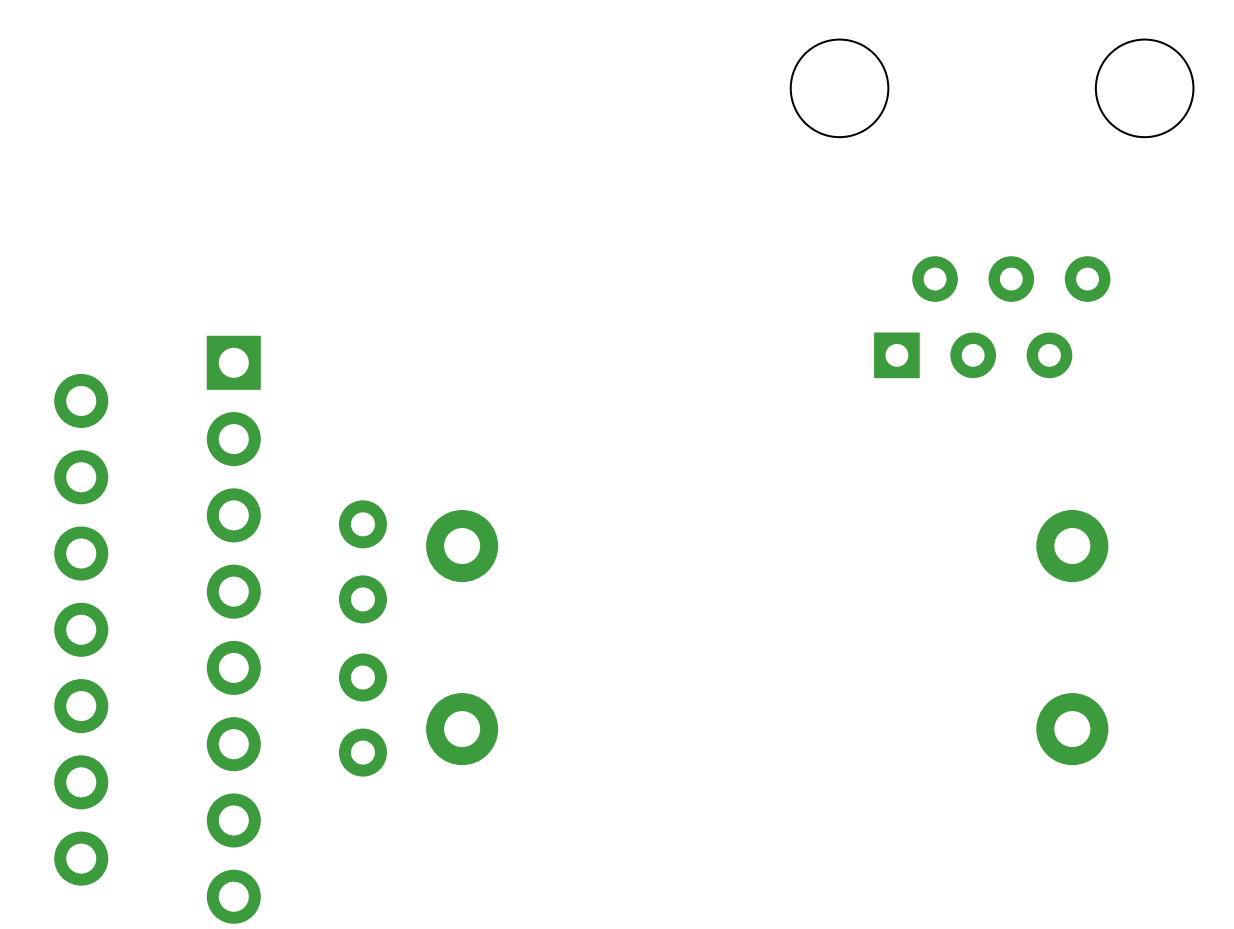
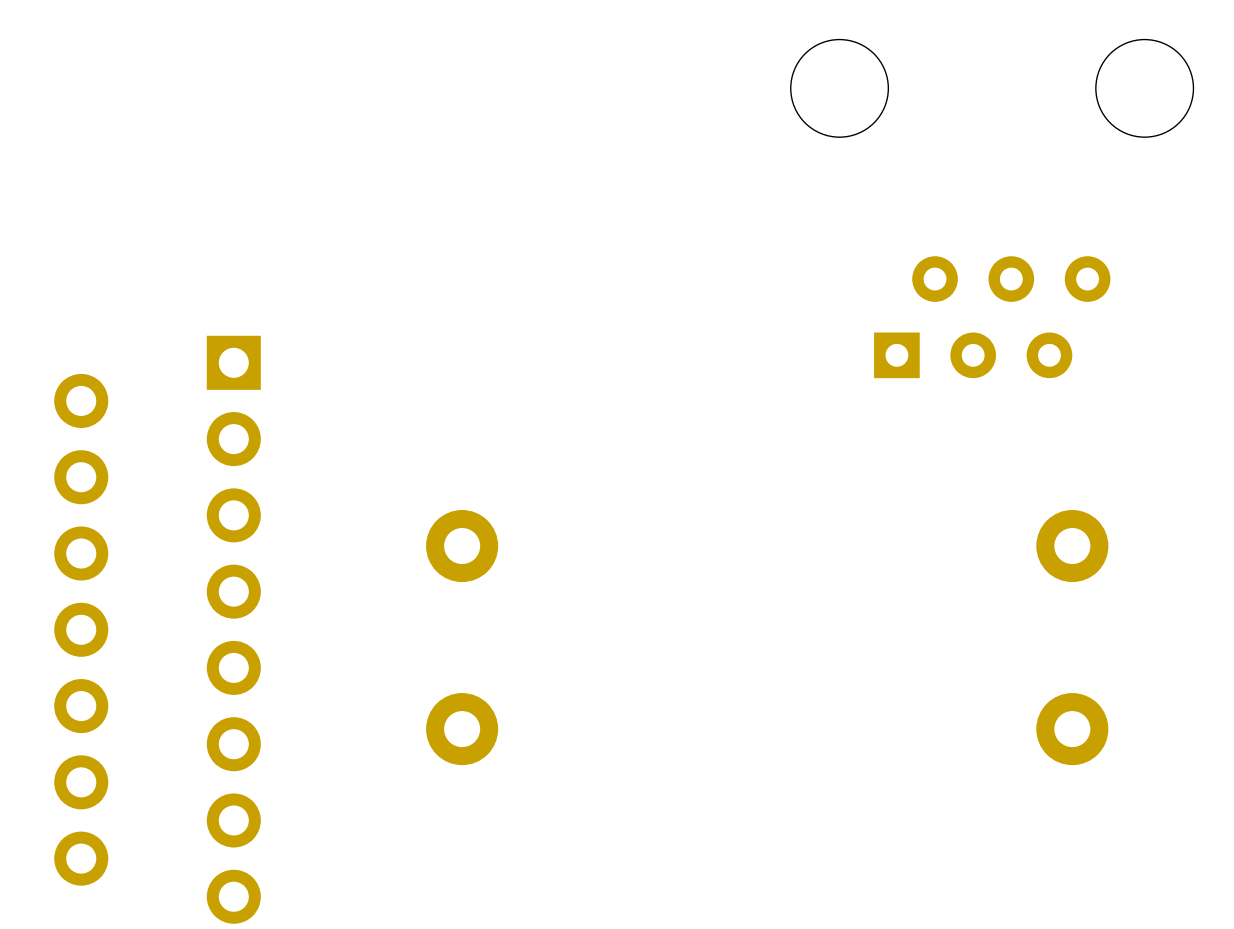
part: (362, 561) -> none
part: (362, 715) -> none

